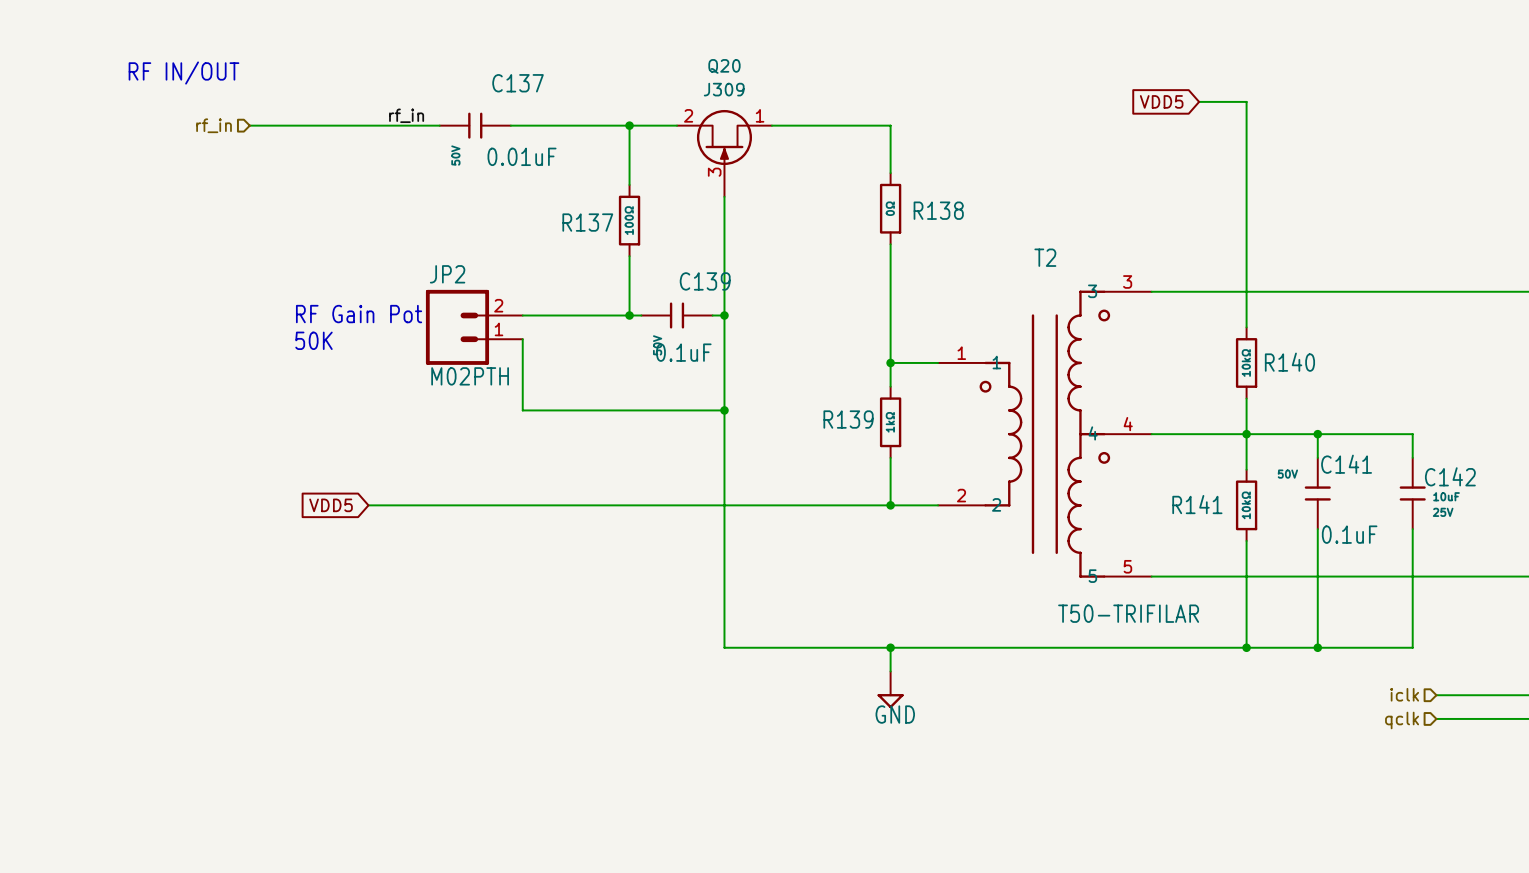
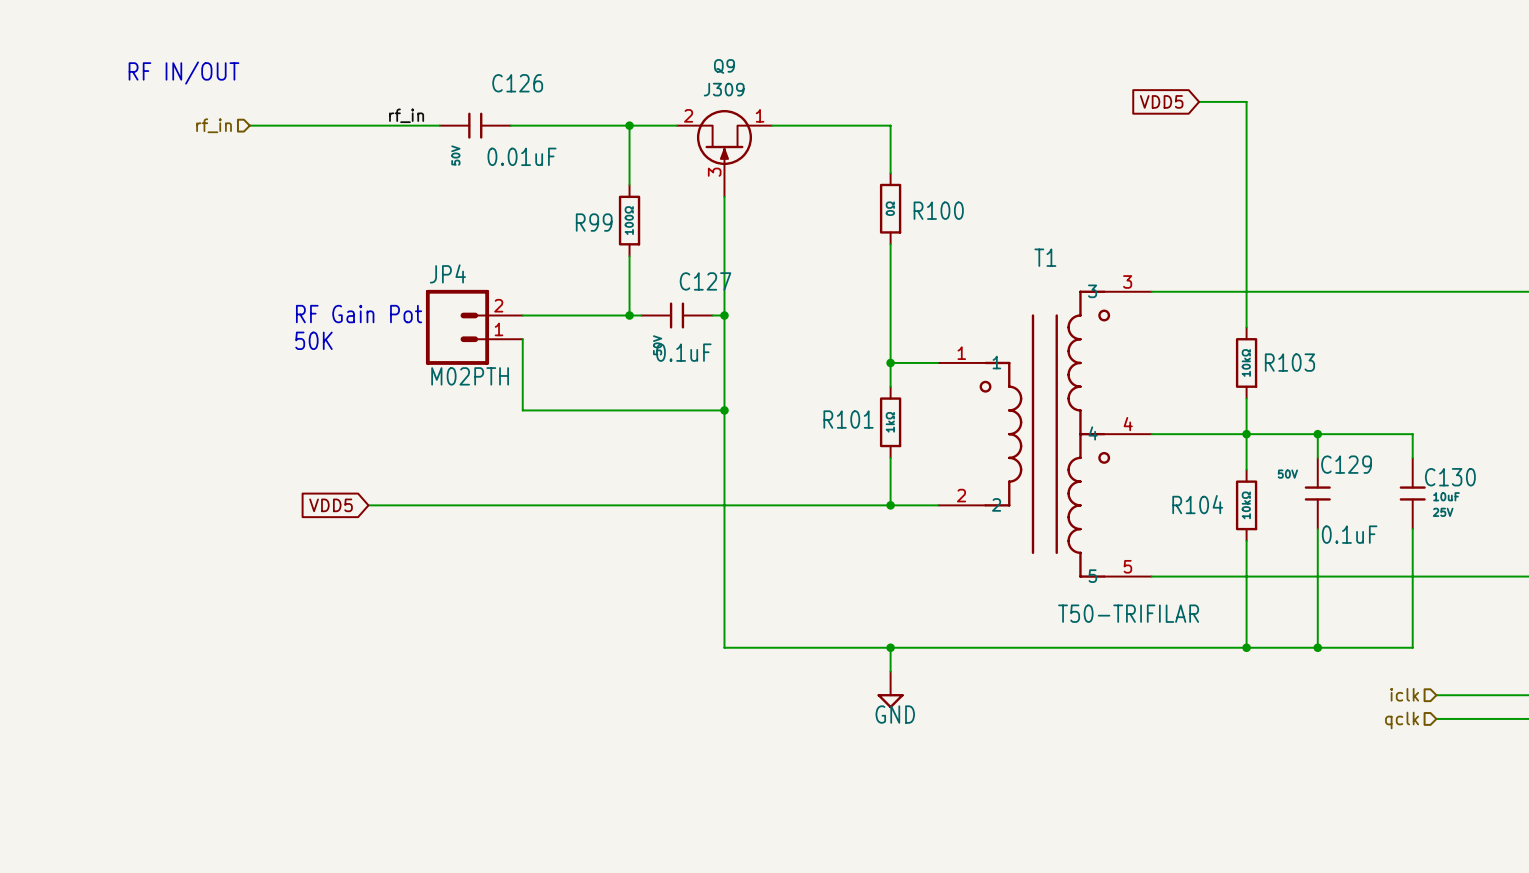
Q20 name: Q20 (724, 66) -> Q9 (724, 66)
C137 name: C137 (518, 83) -> C126 (517, 83)
R138 name: R138 (938, 210) -> R100 (938, 210)
R137 name: R137 (587, 222) -> R99 (594, 222)
T2 name: T2 (1045, 257) -> T1 (1045, 257)
JP2 name: JP2 (447, 274) -> JP4 (447, 273)
C139 name: C139 (705, 281) -> C127 (705, 281)
R140 name: R140 (1289, 362) -> R103 (1289, 362)
R139 name: R139 (848, 419) -> R101 (848, 419)
C141 name: C141 (1346, 464) -> C129 (1346, 464)
C142 name: C142 (1450, 476) -> C130 (1450, 477)
R141 name: R141 (1197, 504) -> R104 (1197, 504)

